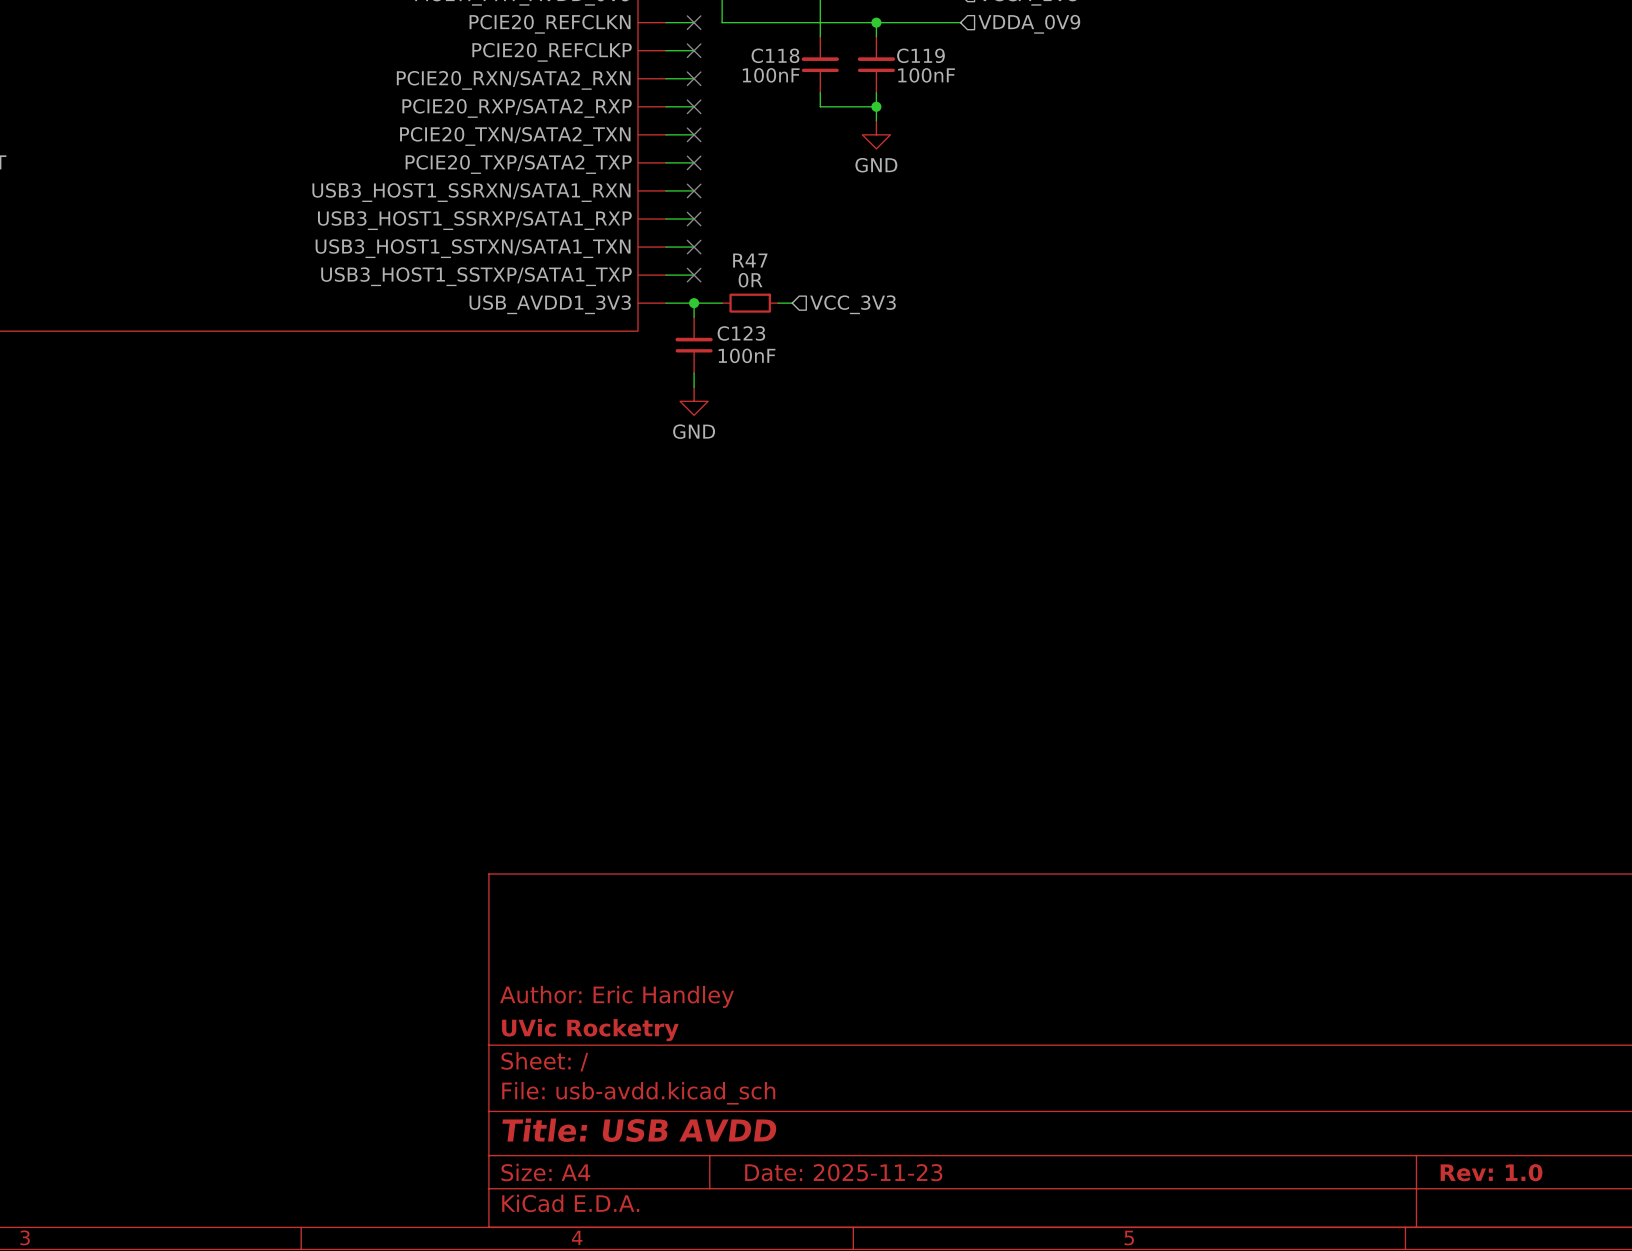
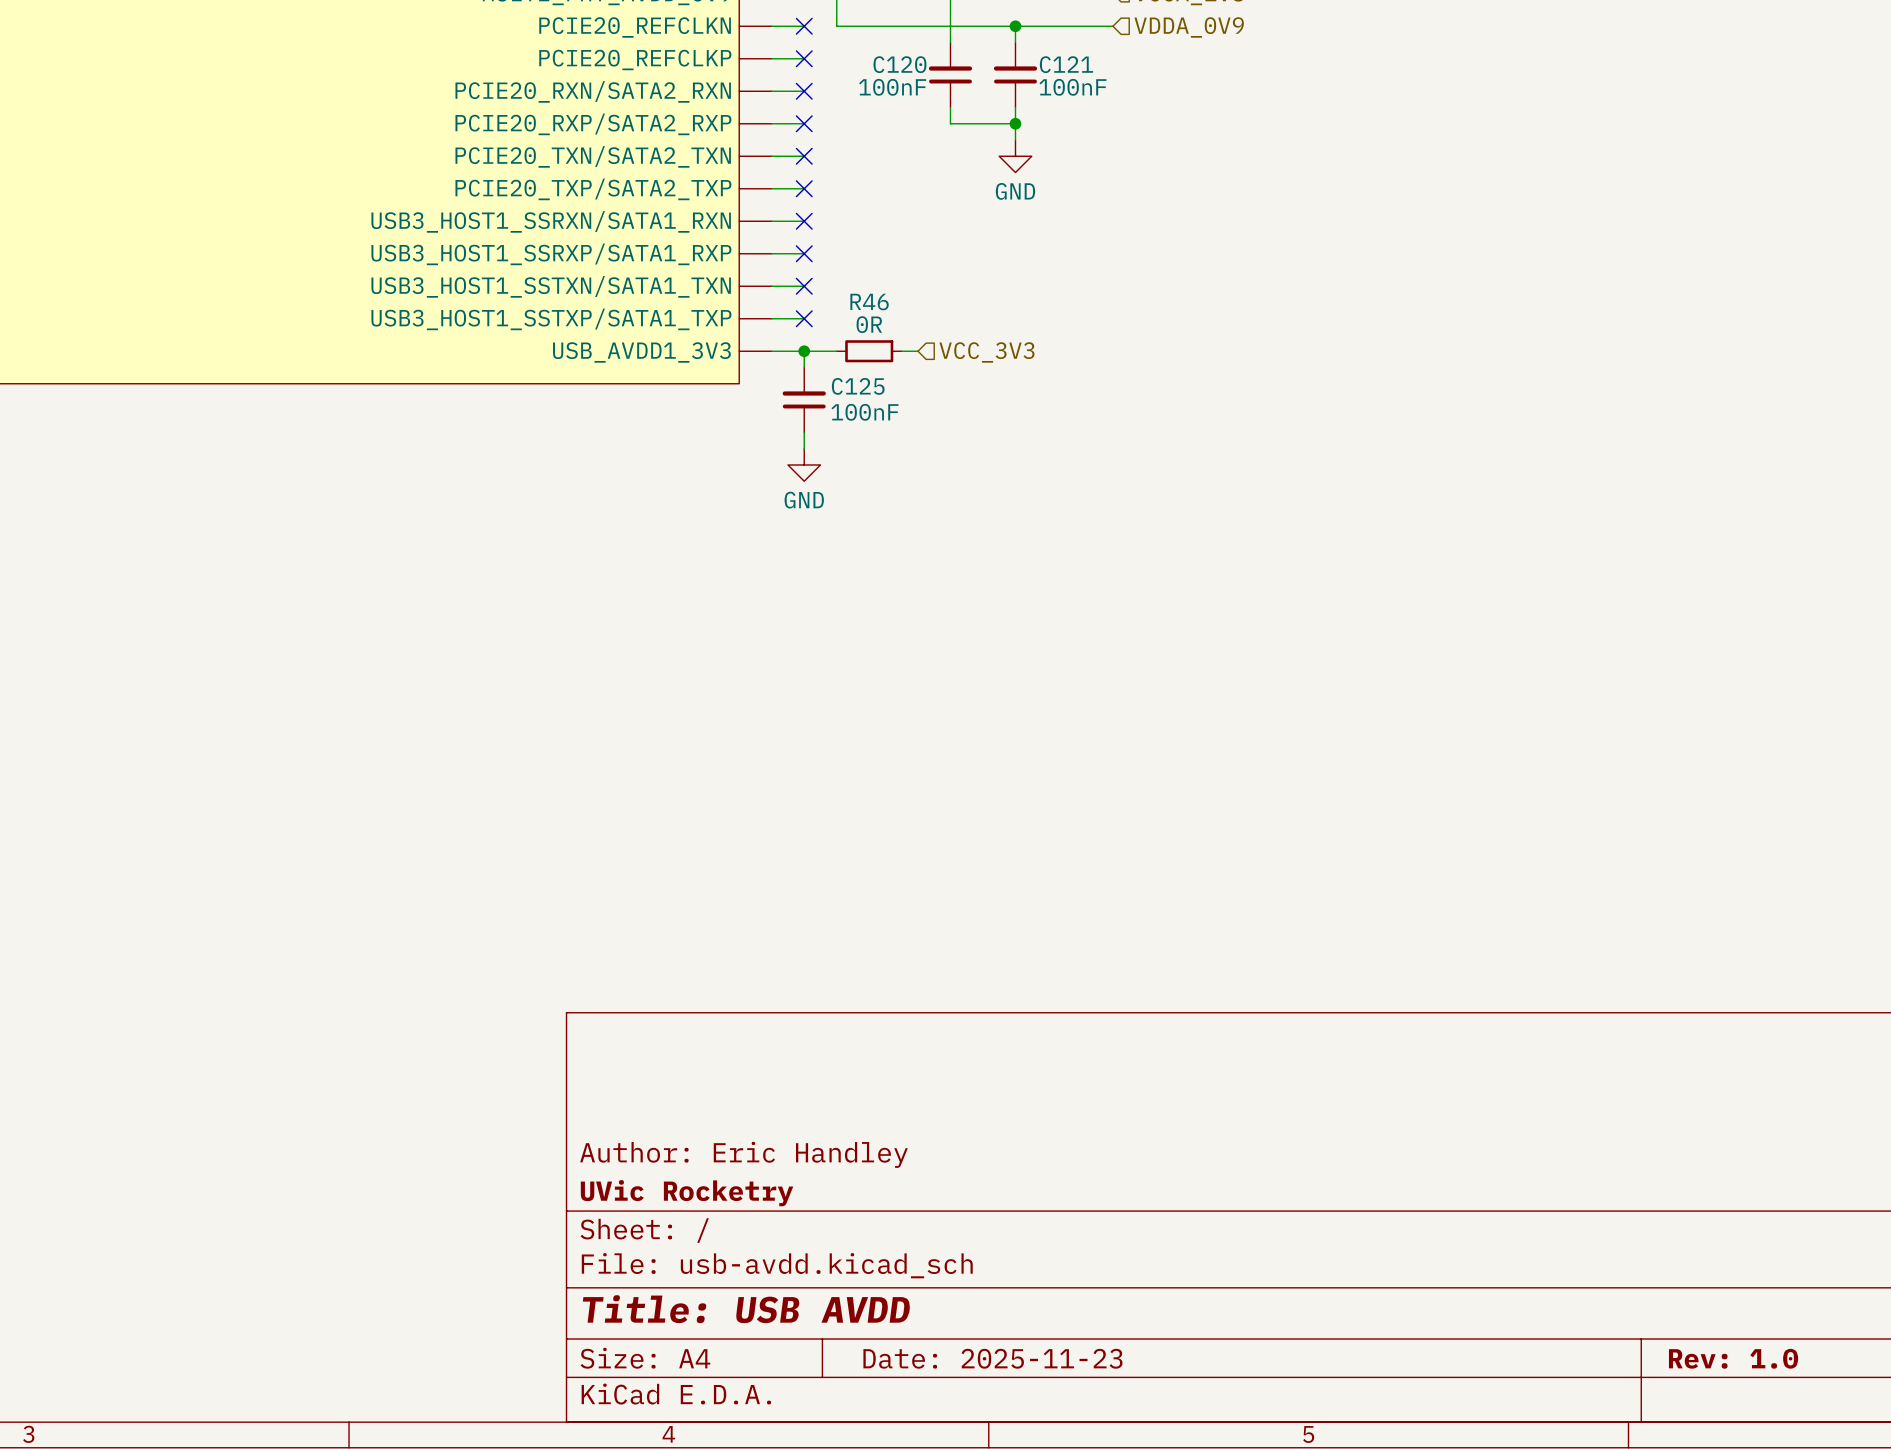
C118 name: C118 (775, 55) -> C120 (899, 64)
C119 name: C119 (920, 55) -> C121 (1066, 64)
R47 name: R47 (750, 260) -> R46 (869, 302)
C123 name: C123 (741, 333) -> C125 (858, 386)

